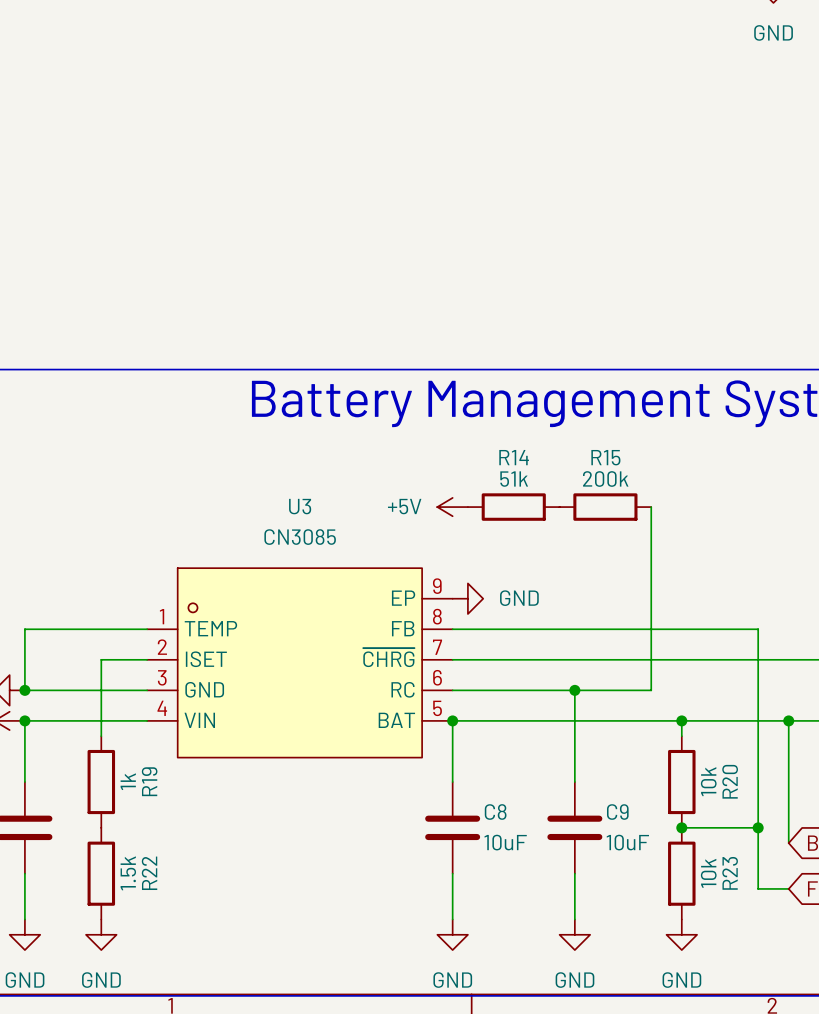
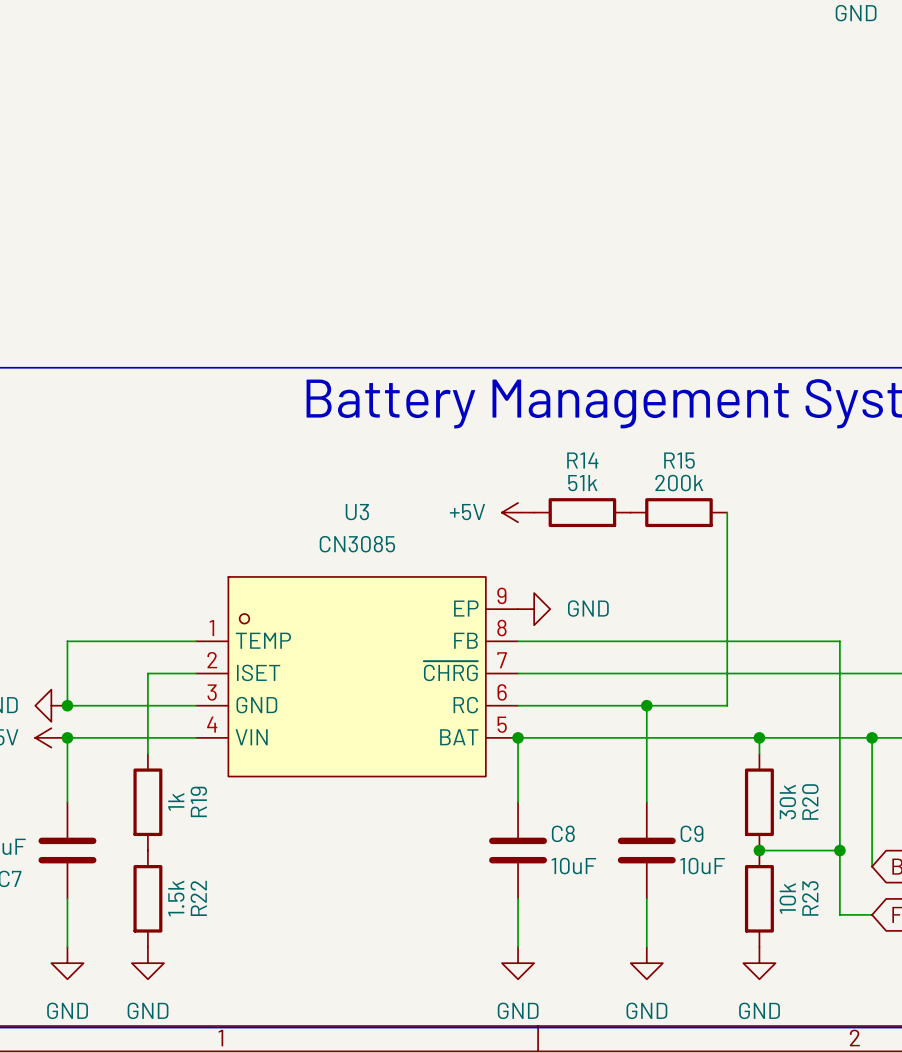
R20 value: 10k (708, 781) -> 30k (787, 802)

